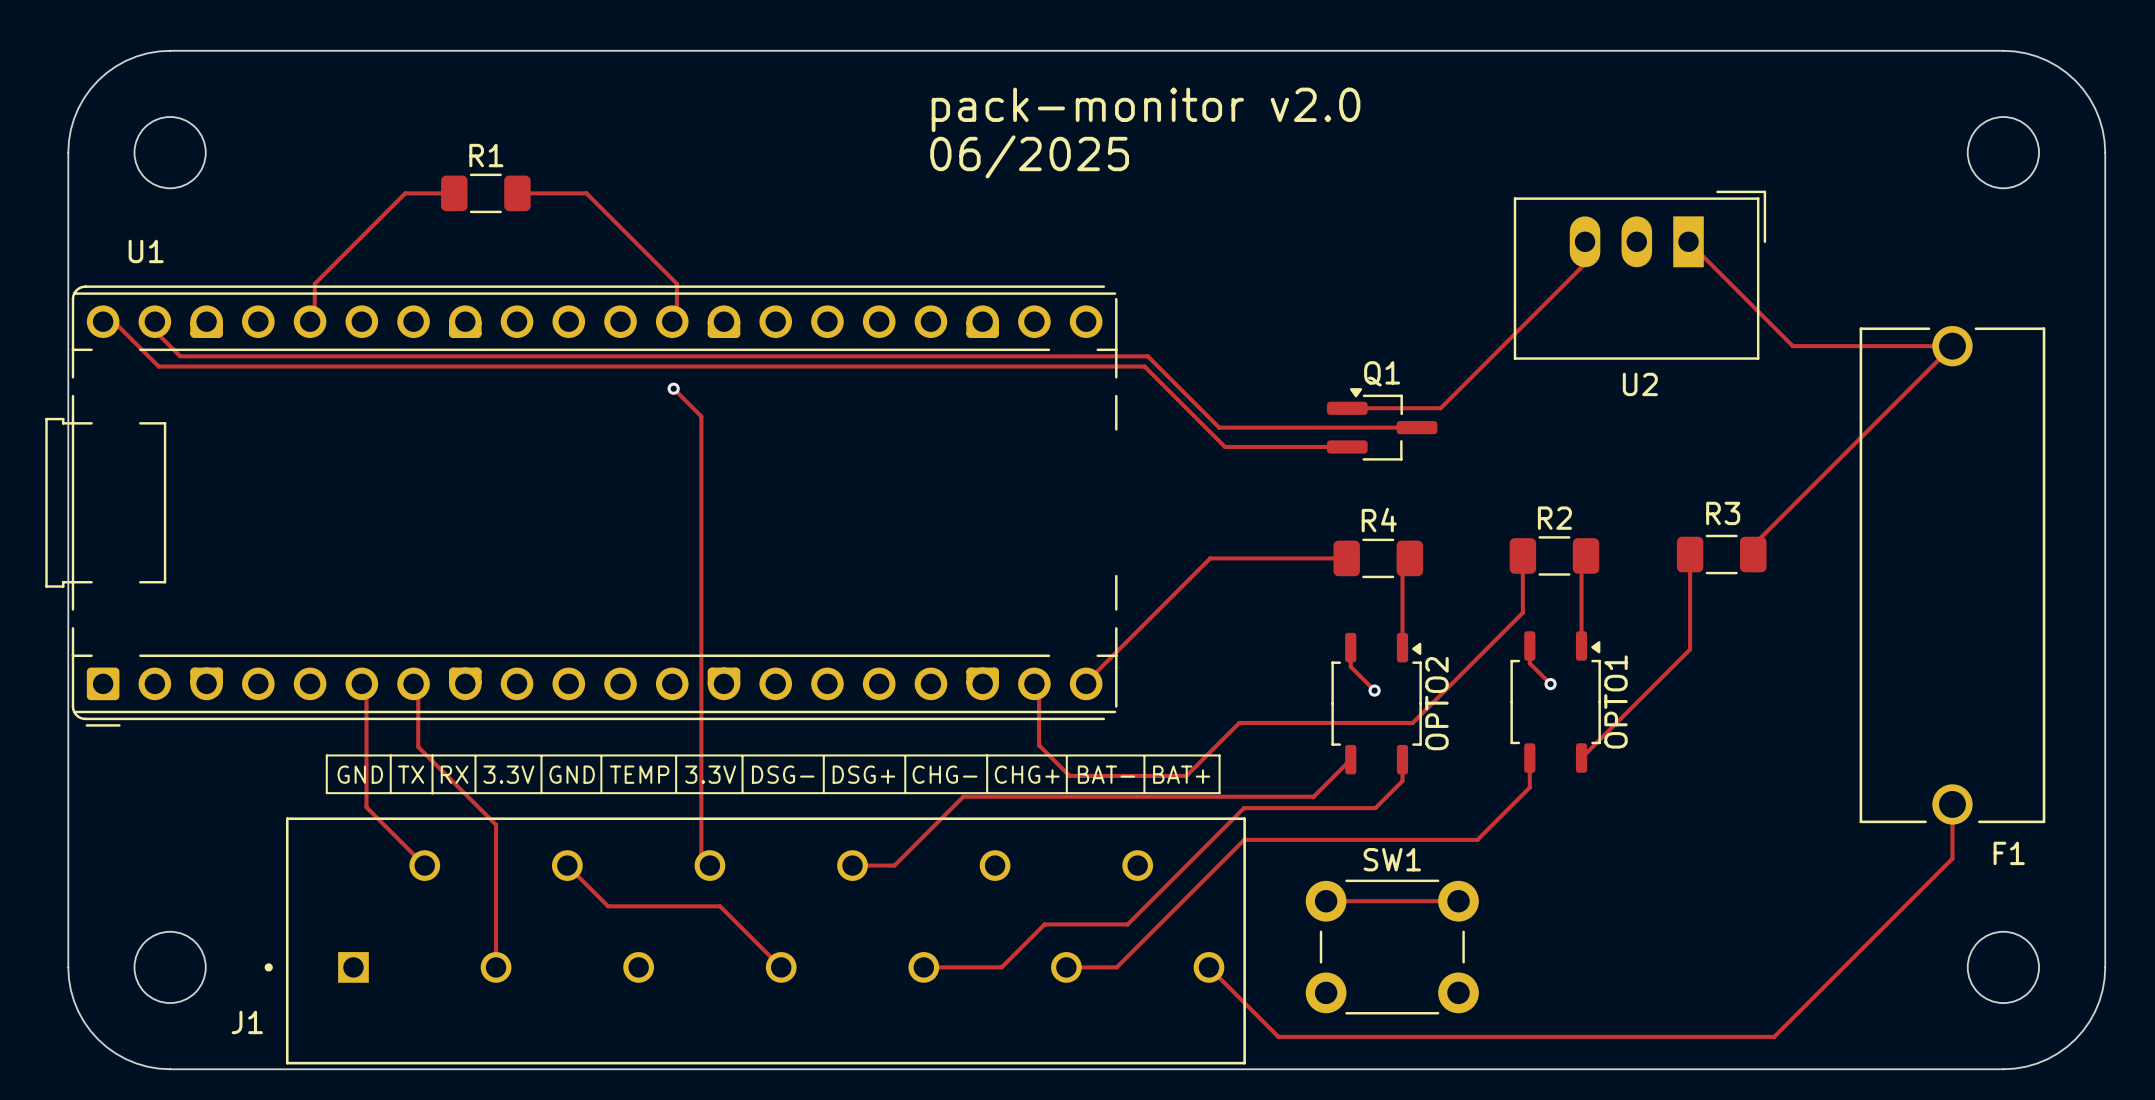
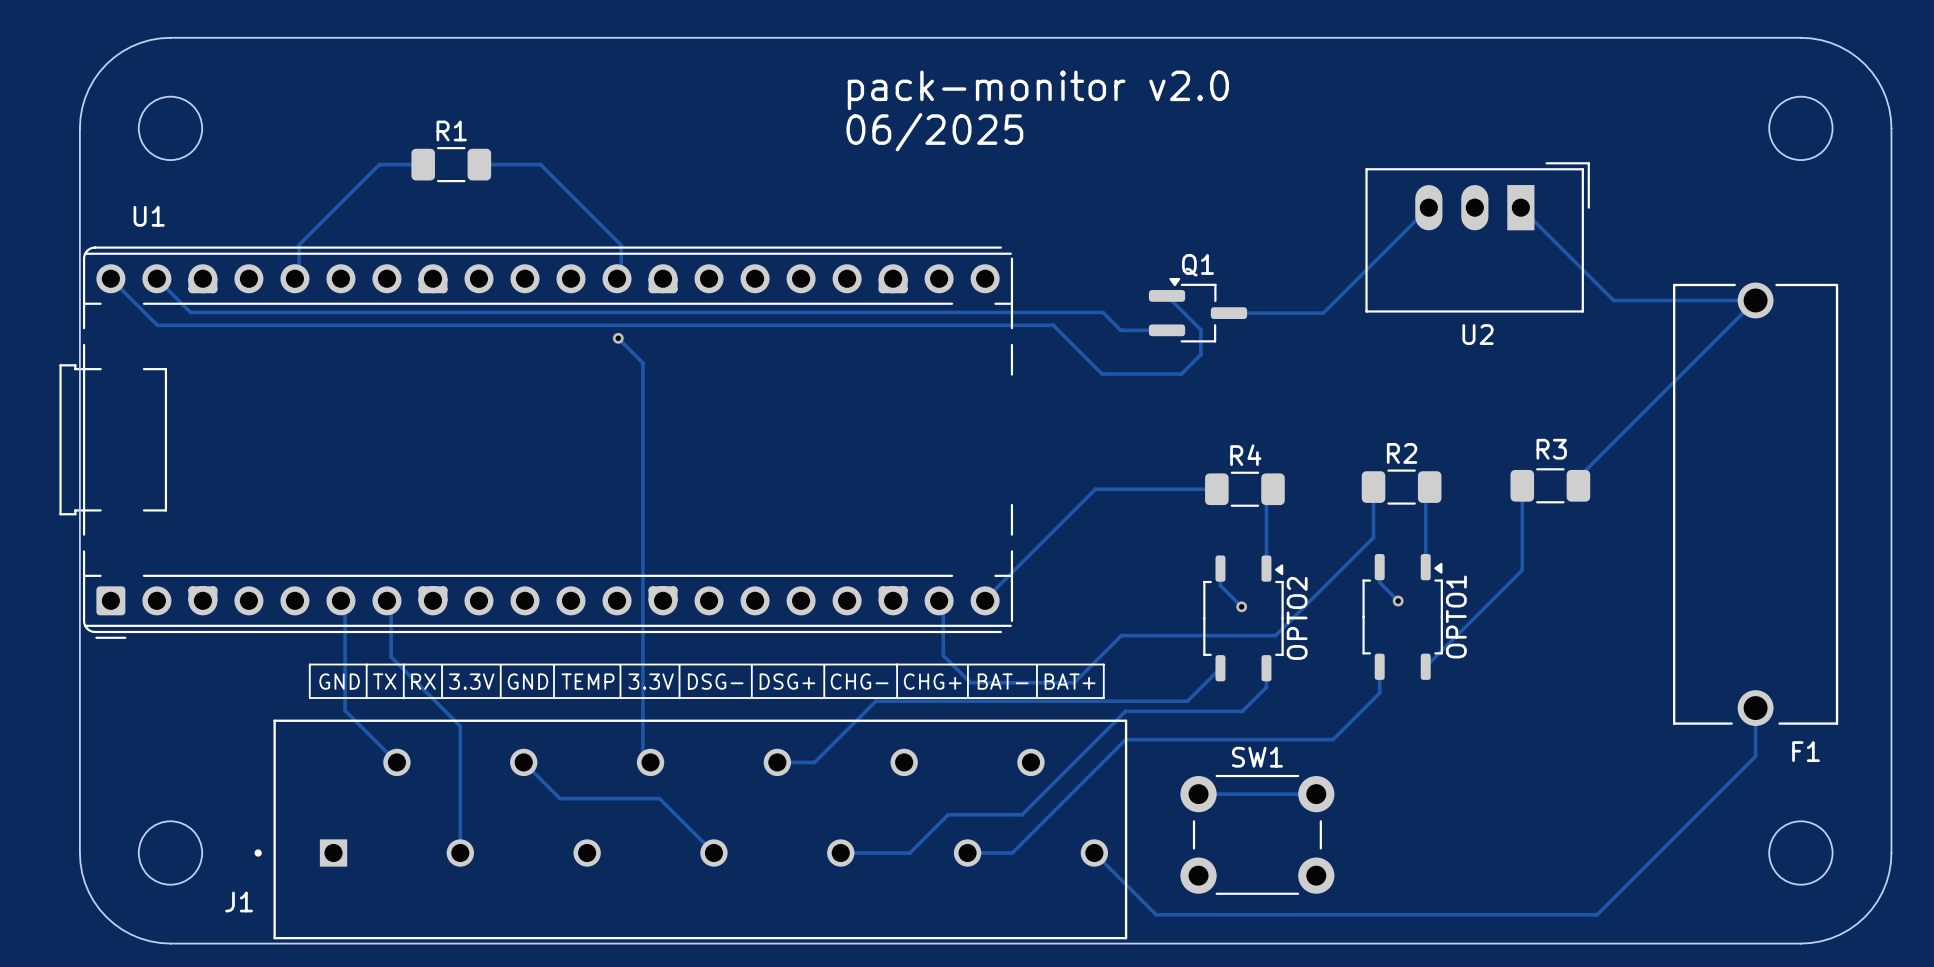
track: none -> (1428, 207) (1323, 313) (1228, 313)
track: (1585, 263) (1440, 408) (1347, 408) -> none
track: (107, 315) (158, 366) (1144, 366) (1225, 446) (1347, 446) -> none
track: none -> (110, 278) (157, 325) (1053, 325) (1102, 374) (1181, 374) (1200, 354) (1200, 329) (1167, 295)
track: none -> (156, 278) (190, 312) (1102, 312) (1120, 330) (1167, 330)
track: (159, 335) (180, 356) (1147, 356) (1219, 427) (1416, 427) -> none
Q1 position: (1382, 424) -> (1198, 310)

